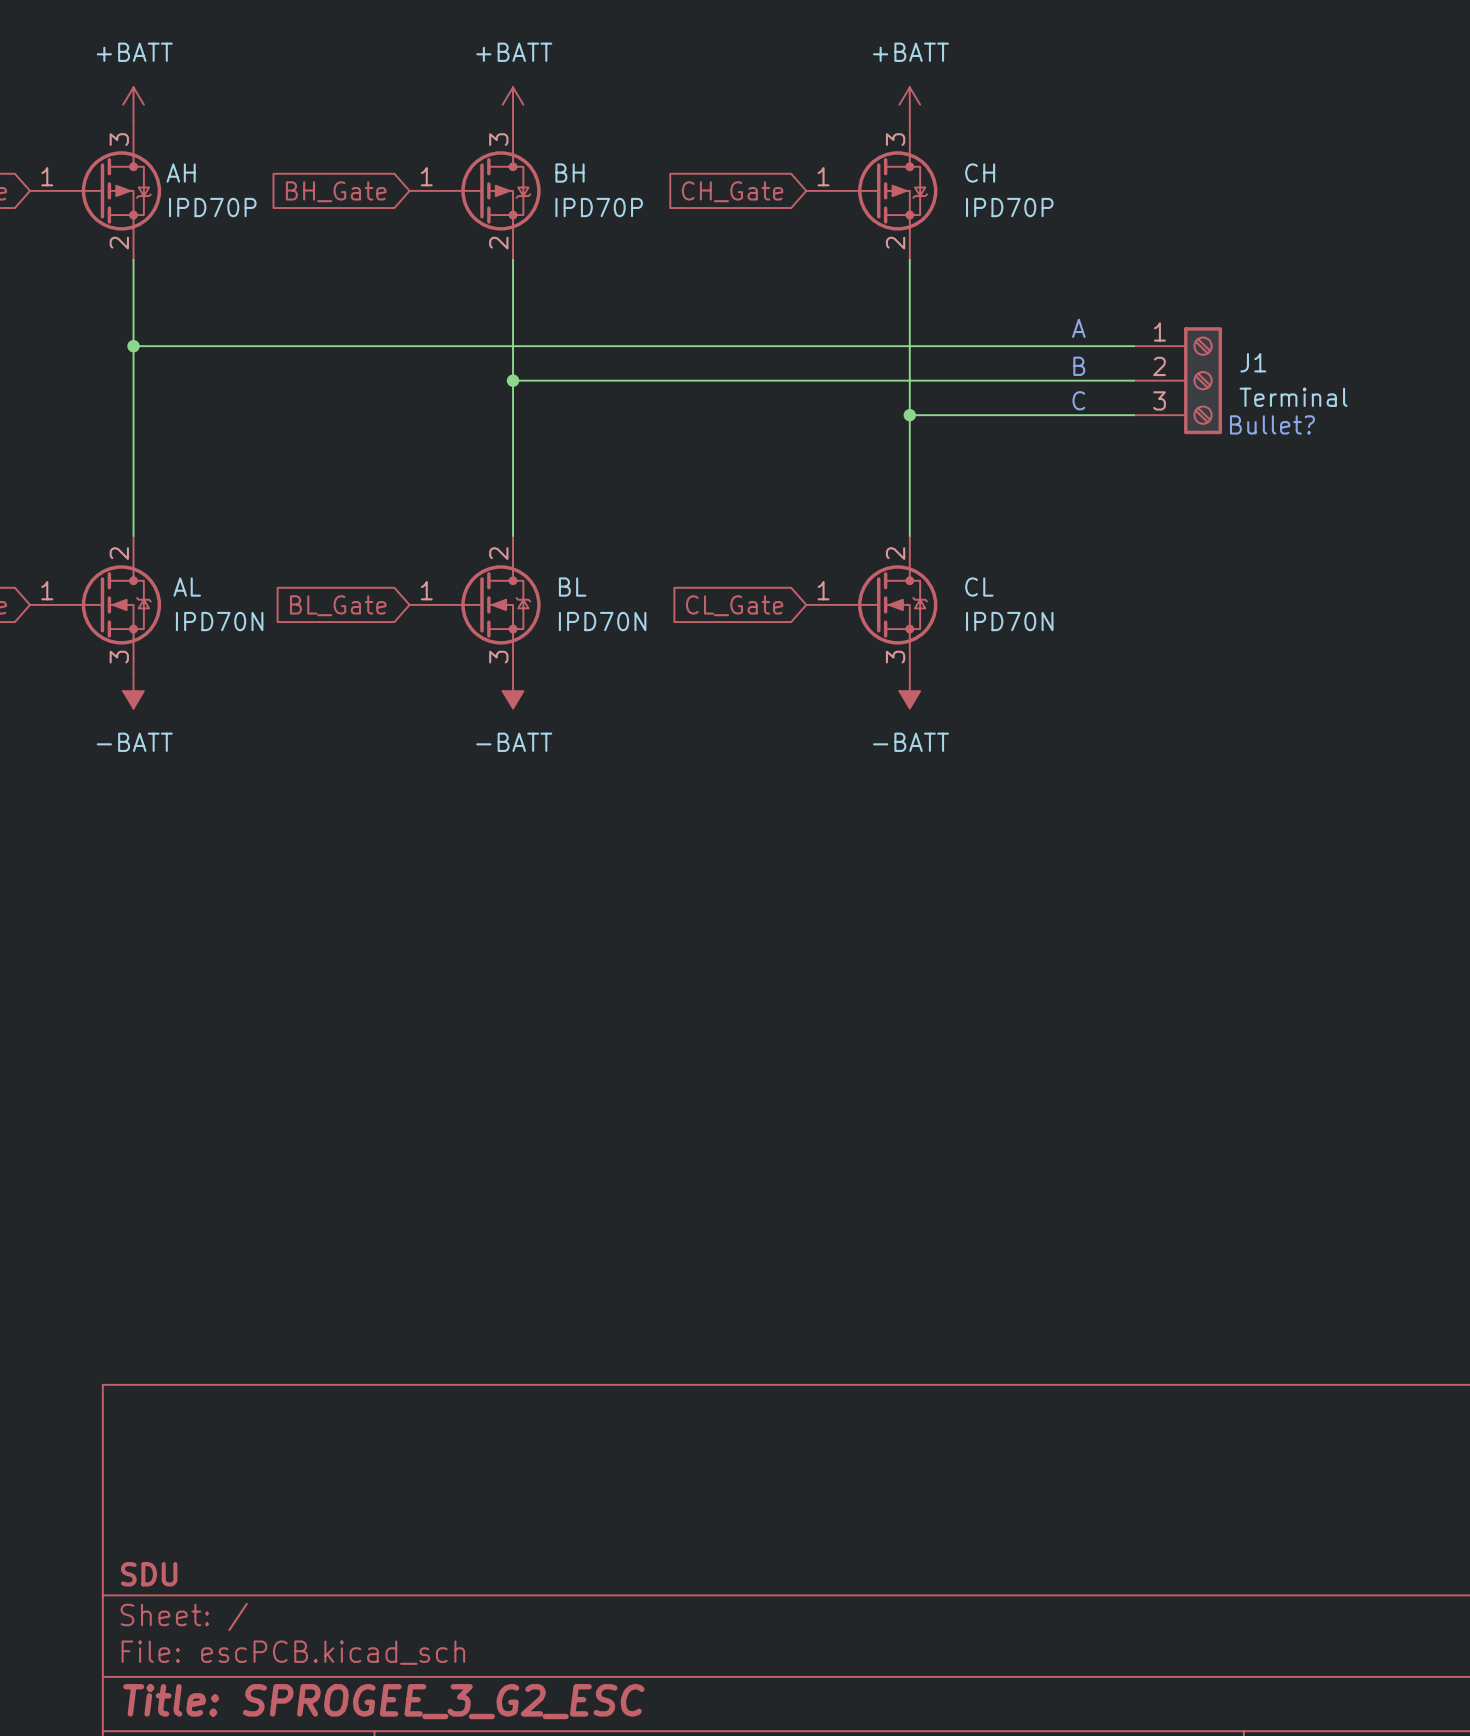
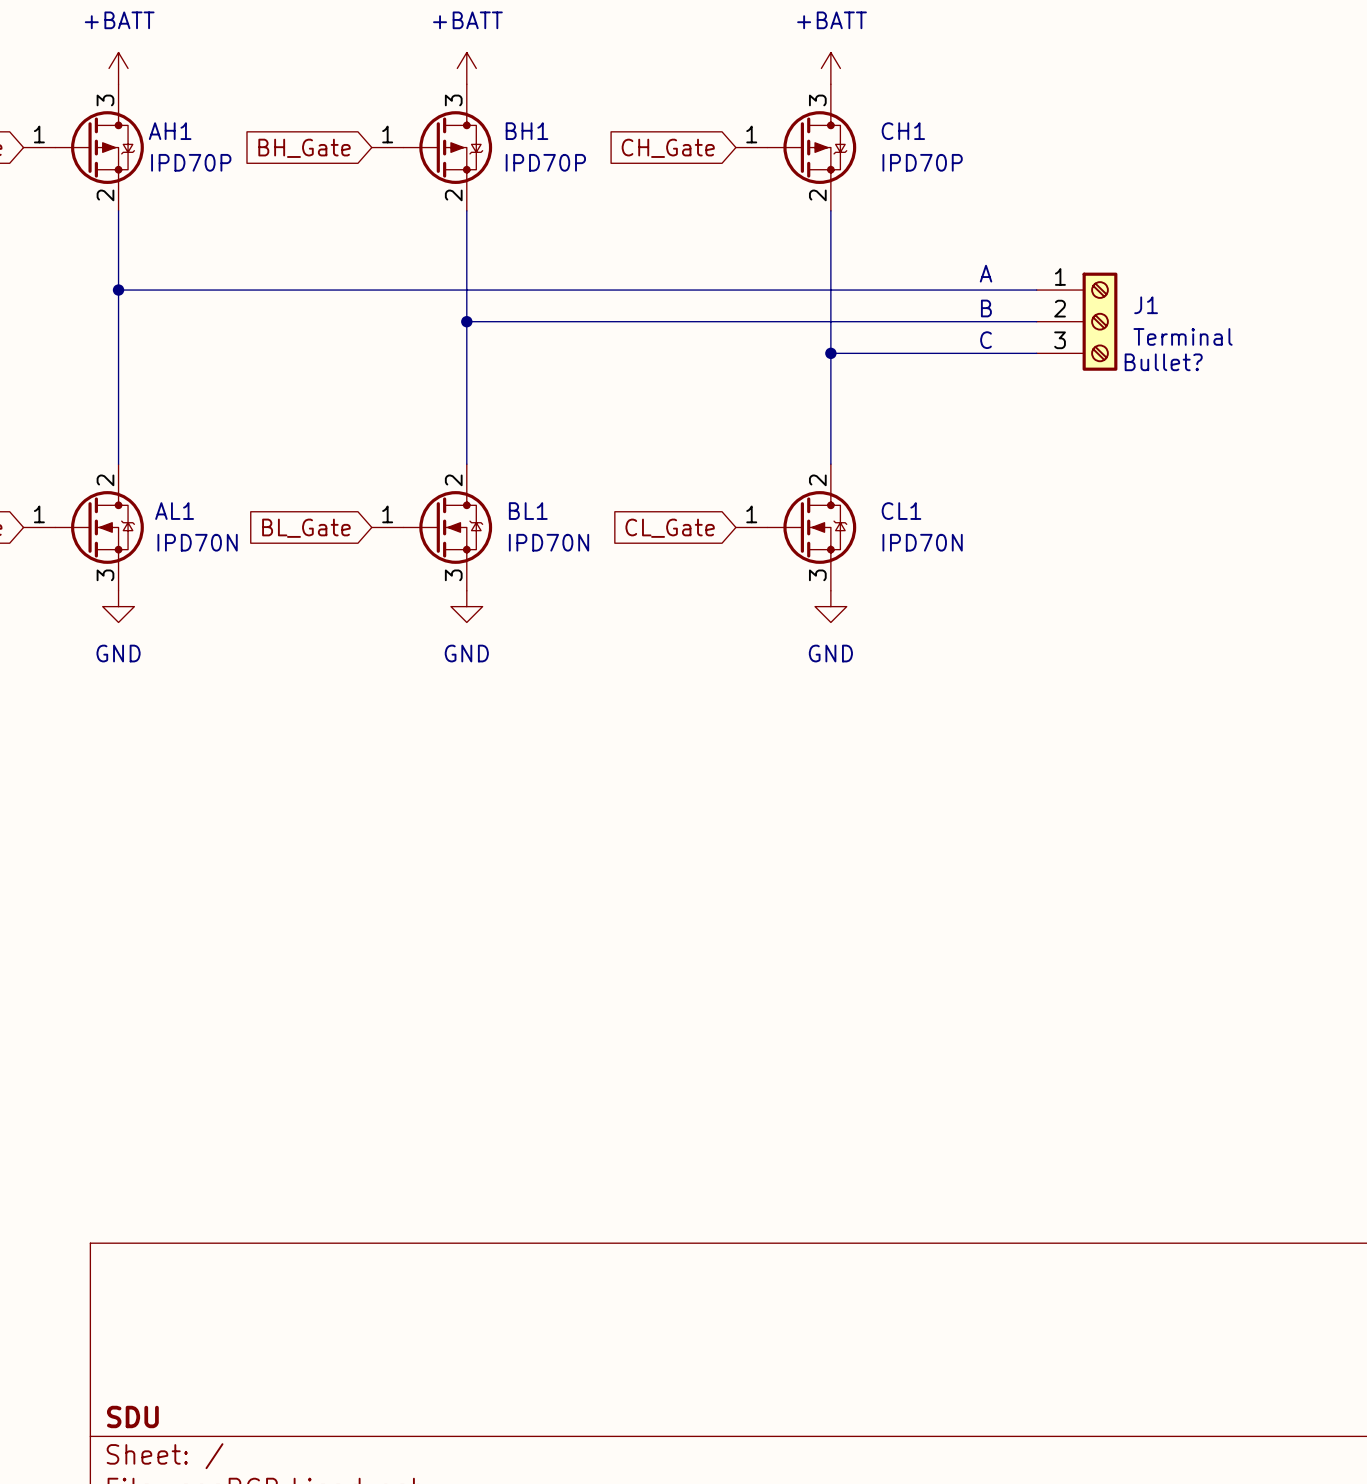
AH name: AH (181, 173) -> AH1 (170, 131)
BH name: BH (570, 173) -> BH1 (527, 131)
CH name: CH (980, 173) -> CH1 (903, 131)
AL name: AL (187, 587) -> AL1 (174, 511)
BL name: BL (572, 587) -> BL1 (528, 511)
CL name: CL (979, 587) -> CL1 (901, 511)
power symbol: -BATT (133, 691) -> GND (118, 606)
power symbol: -BATT (513, 691) -> GND (466, 606)
power symbol: -BATT (909, 691) -> GND (830, 606)

